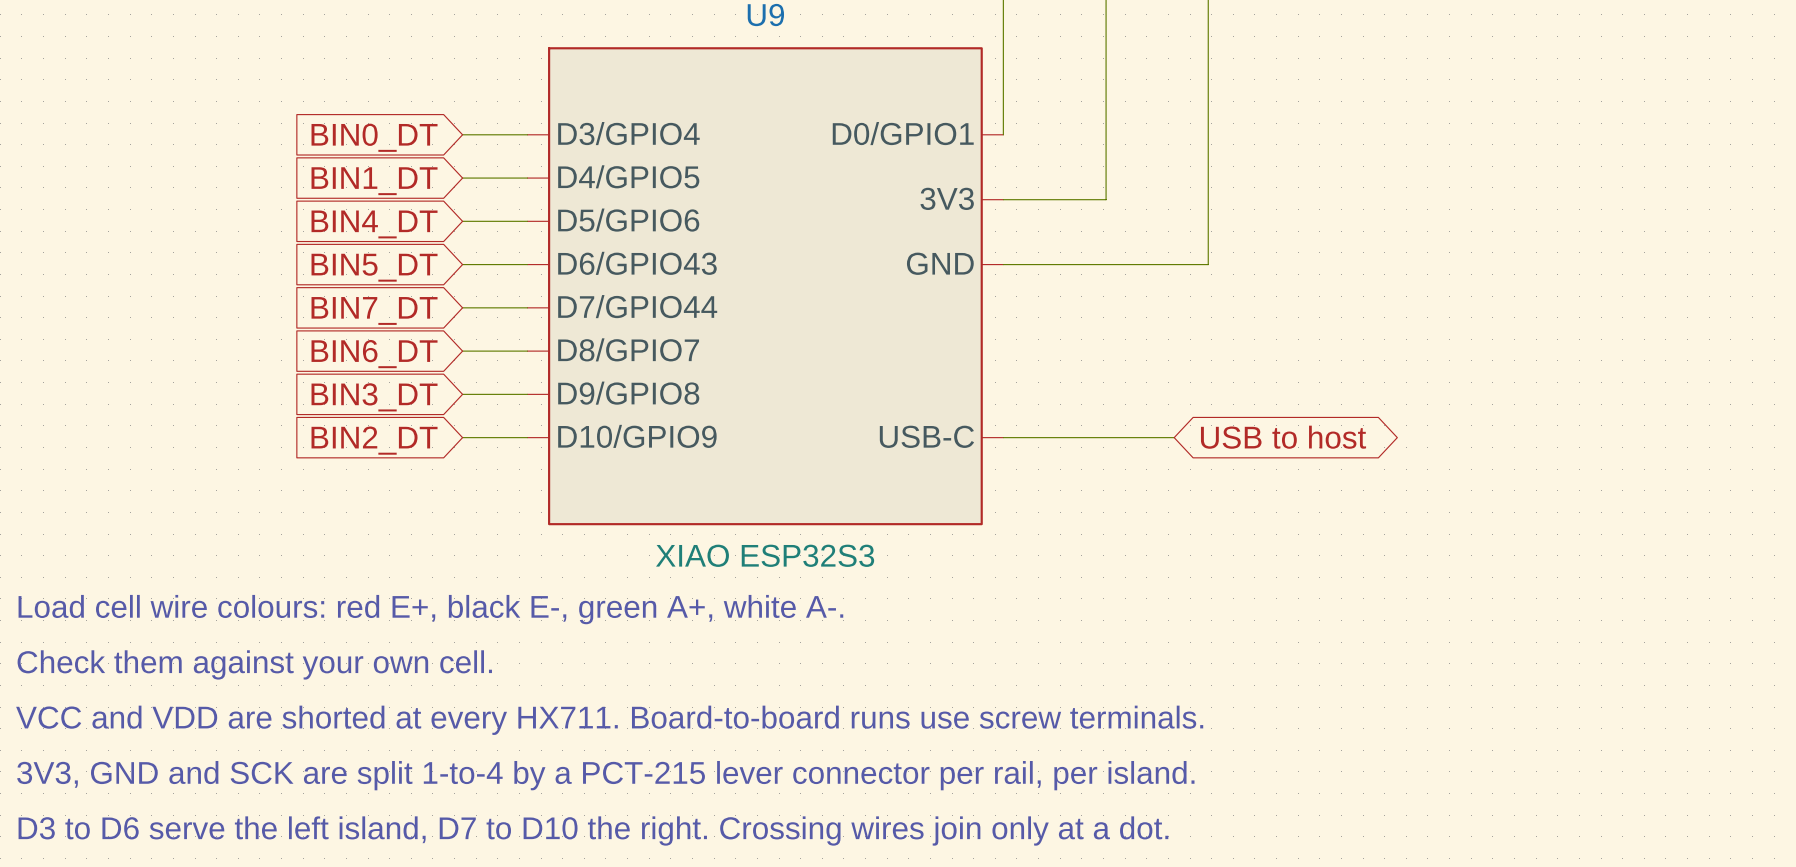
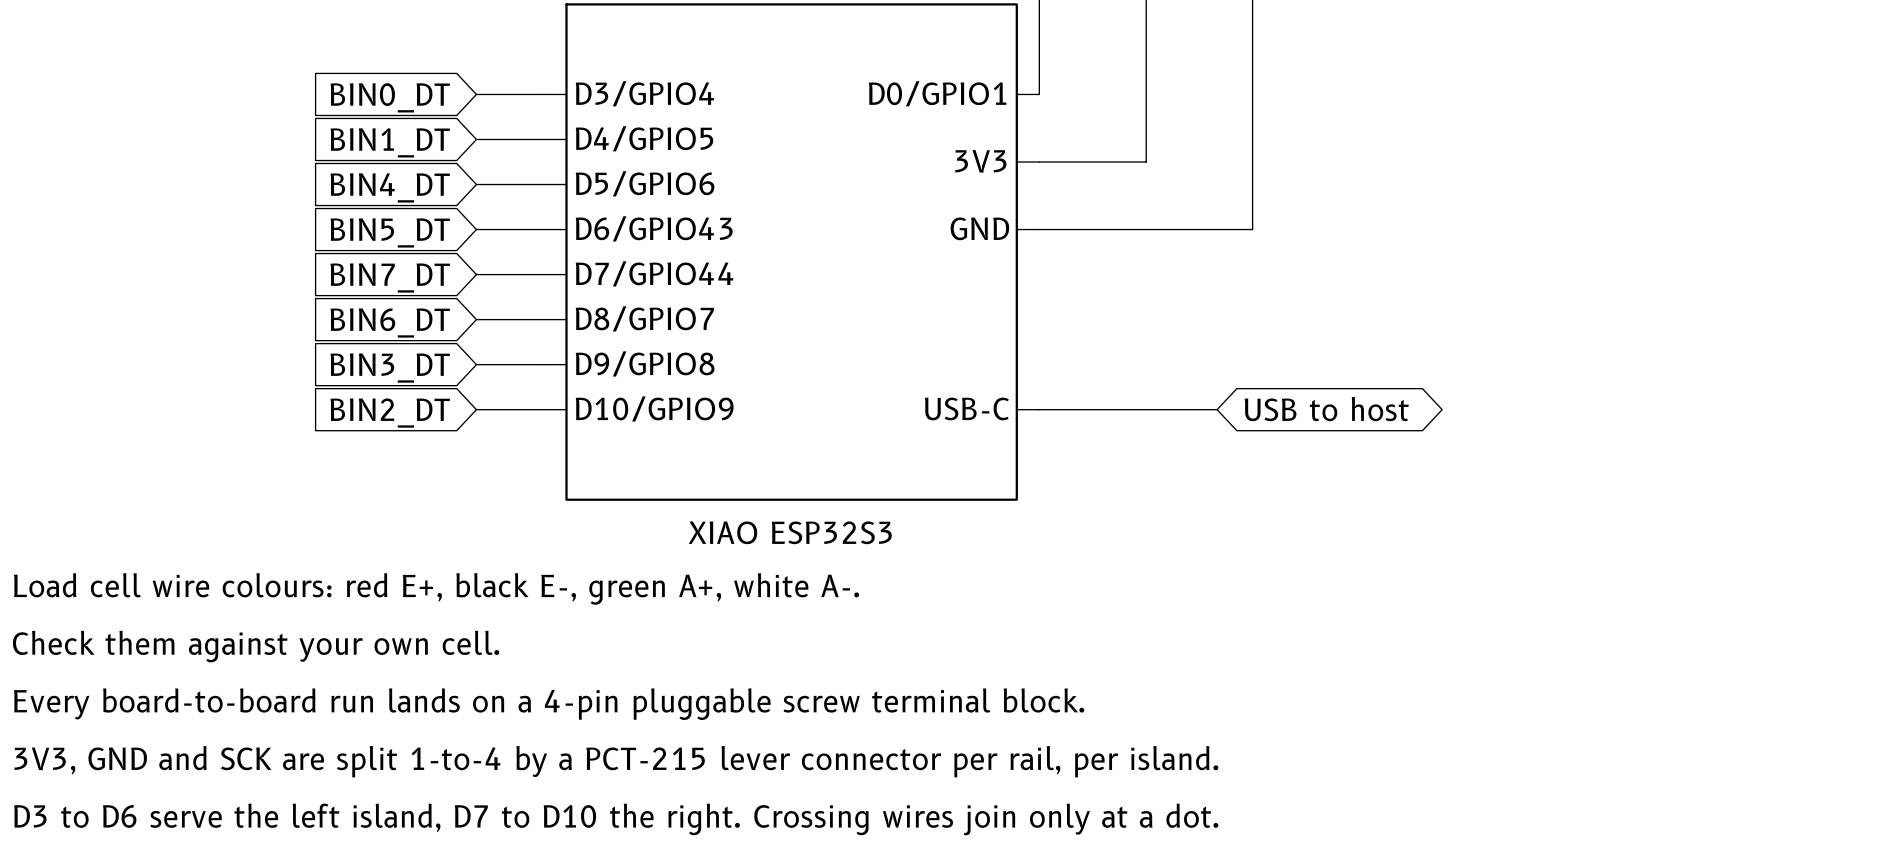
text: VCC and VDD are shorted at every HX711. Board-to-board runs use screw terminals. (609, 720) -> Every board-to-board run lands on a 4-pin pluggable screw terminal block. (549, 704)

